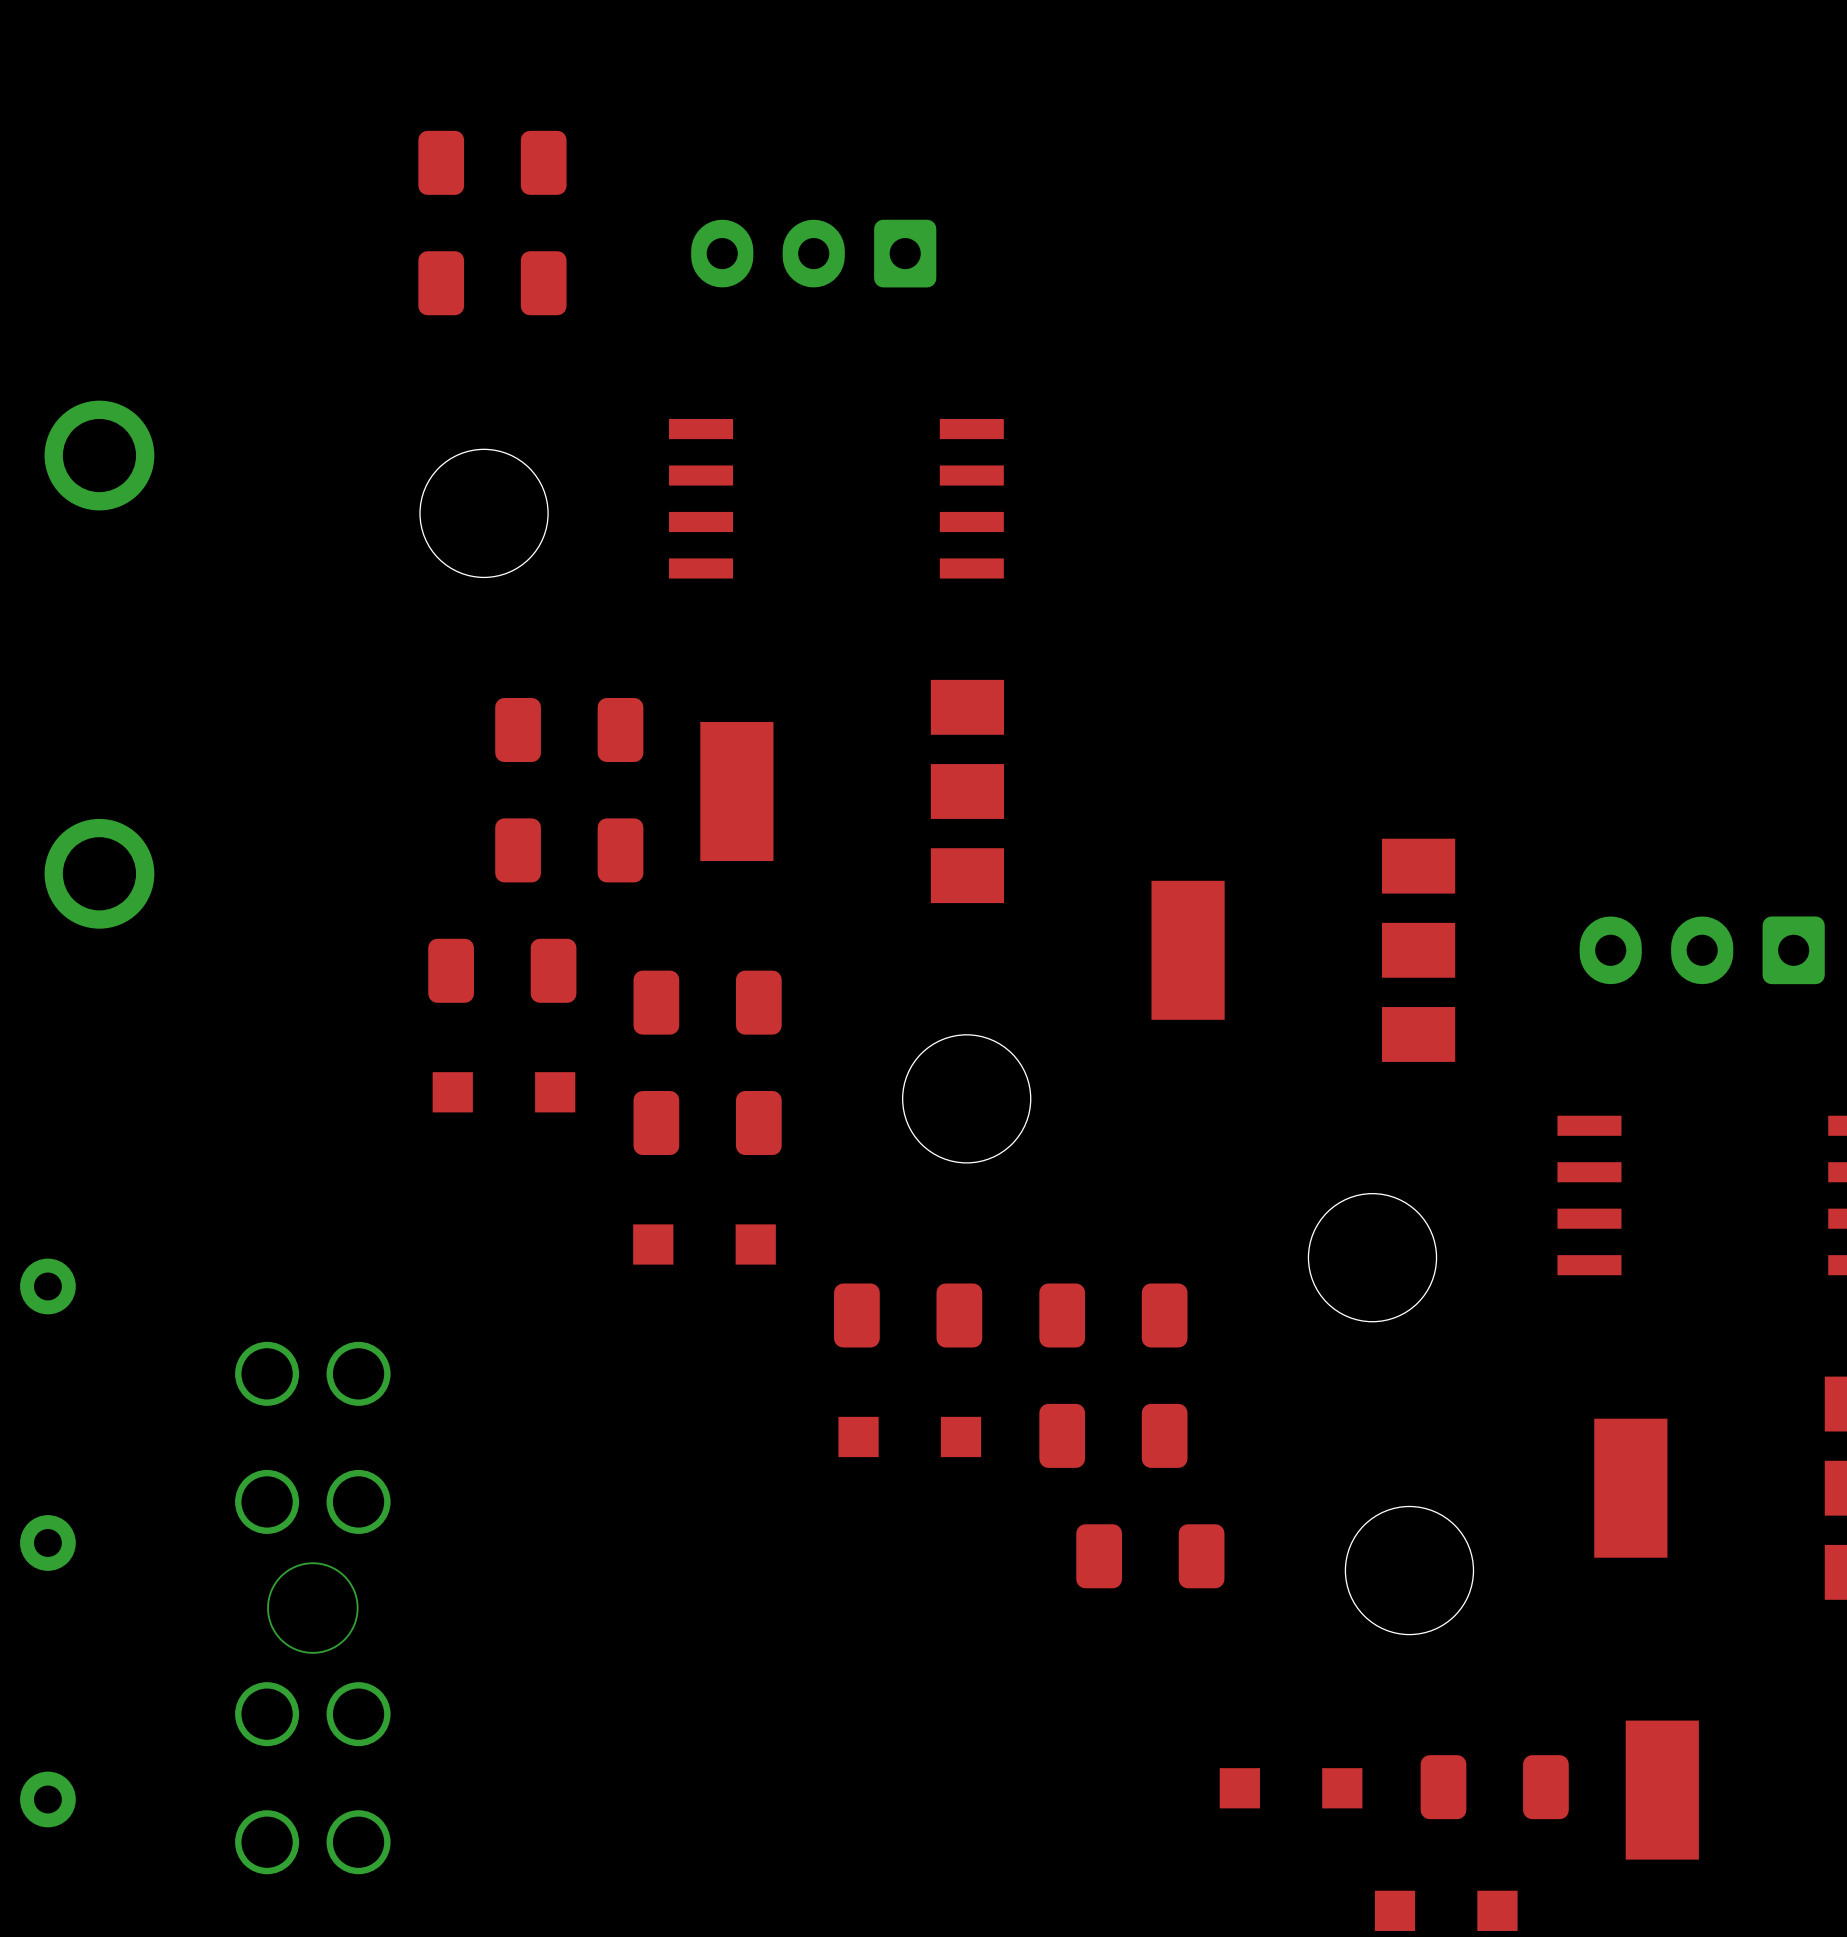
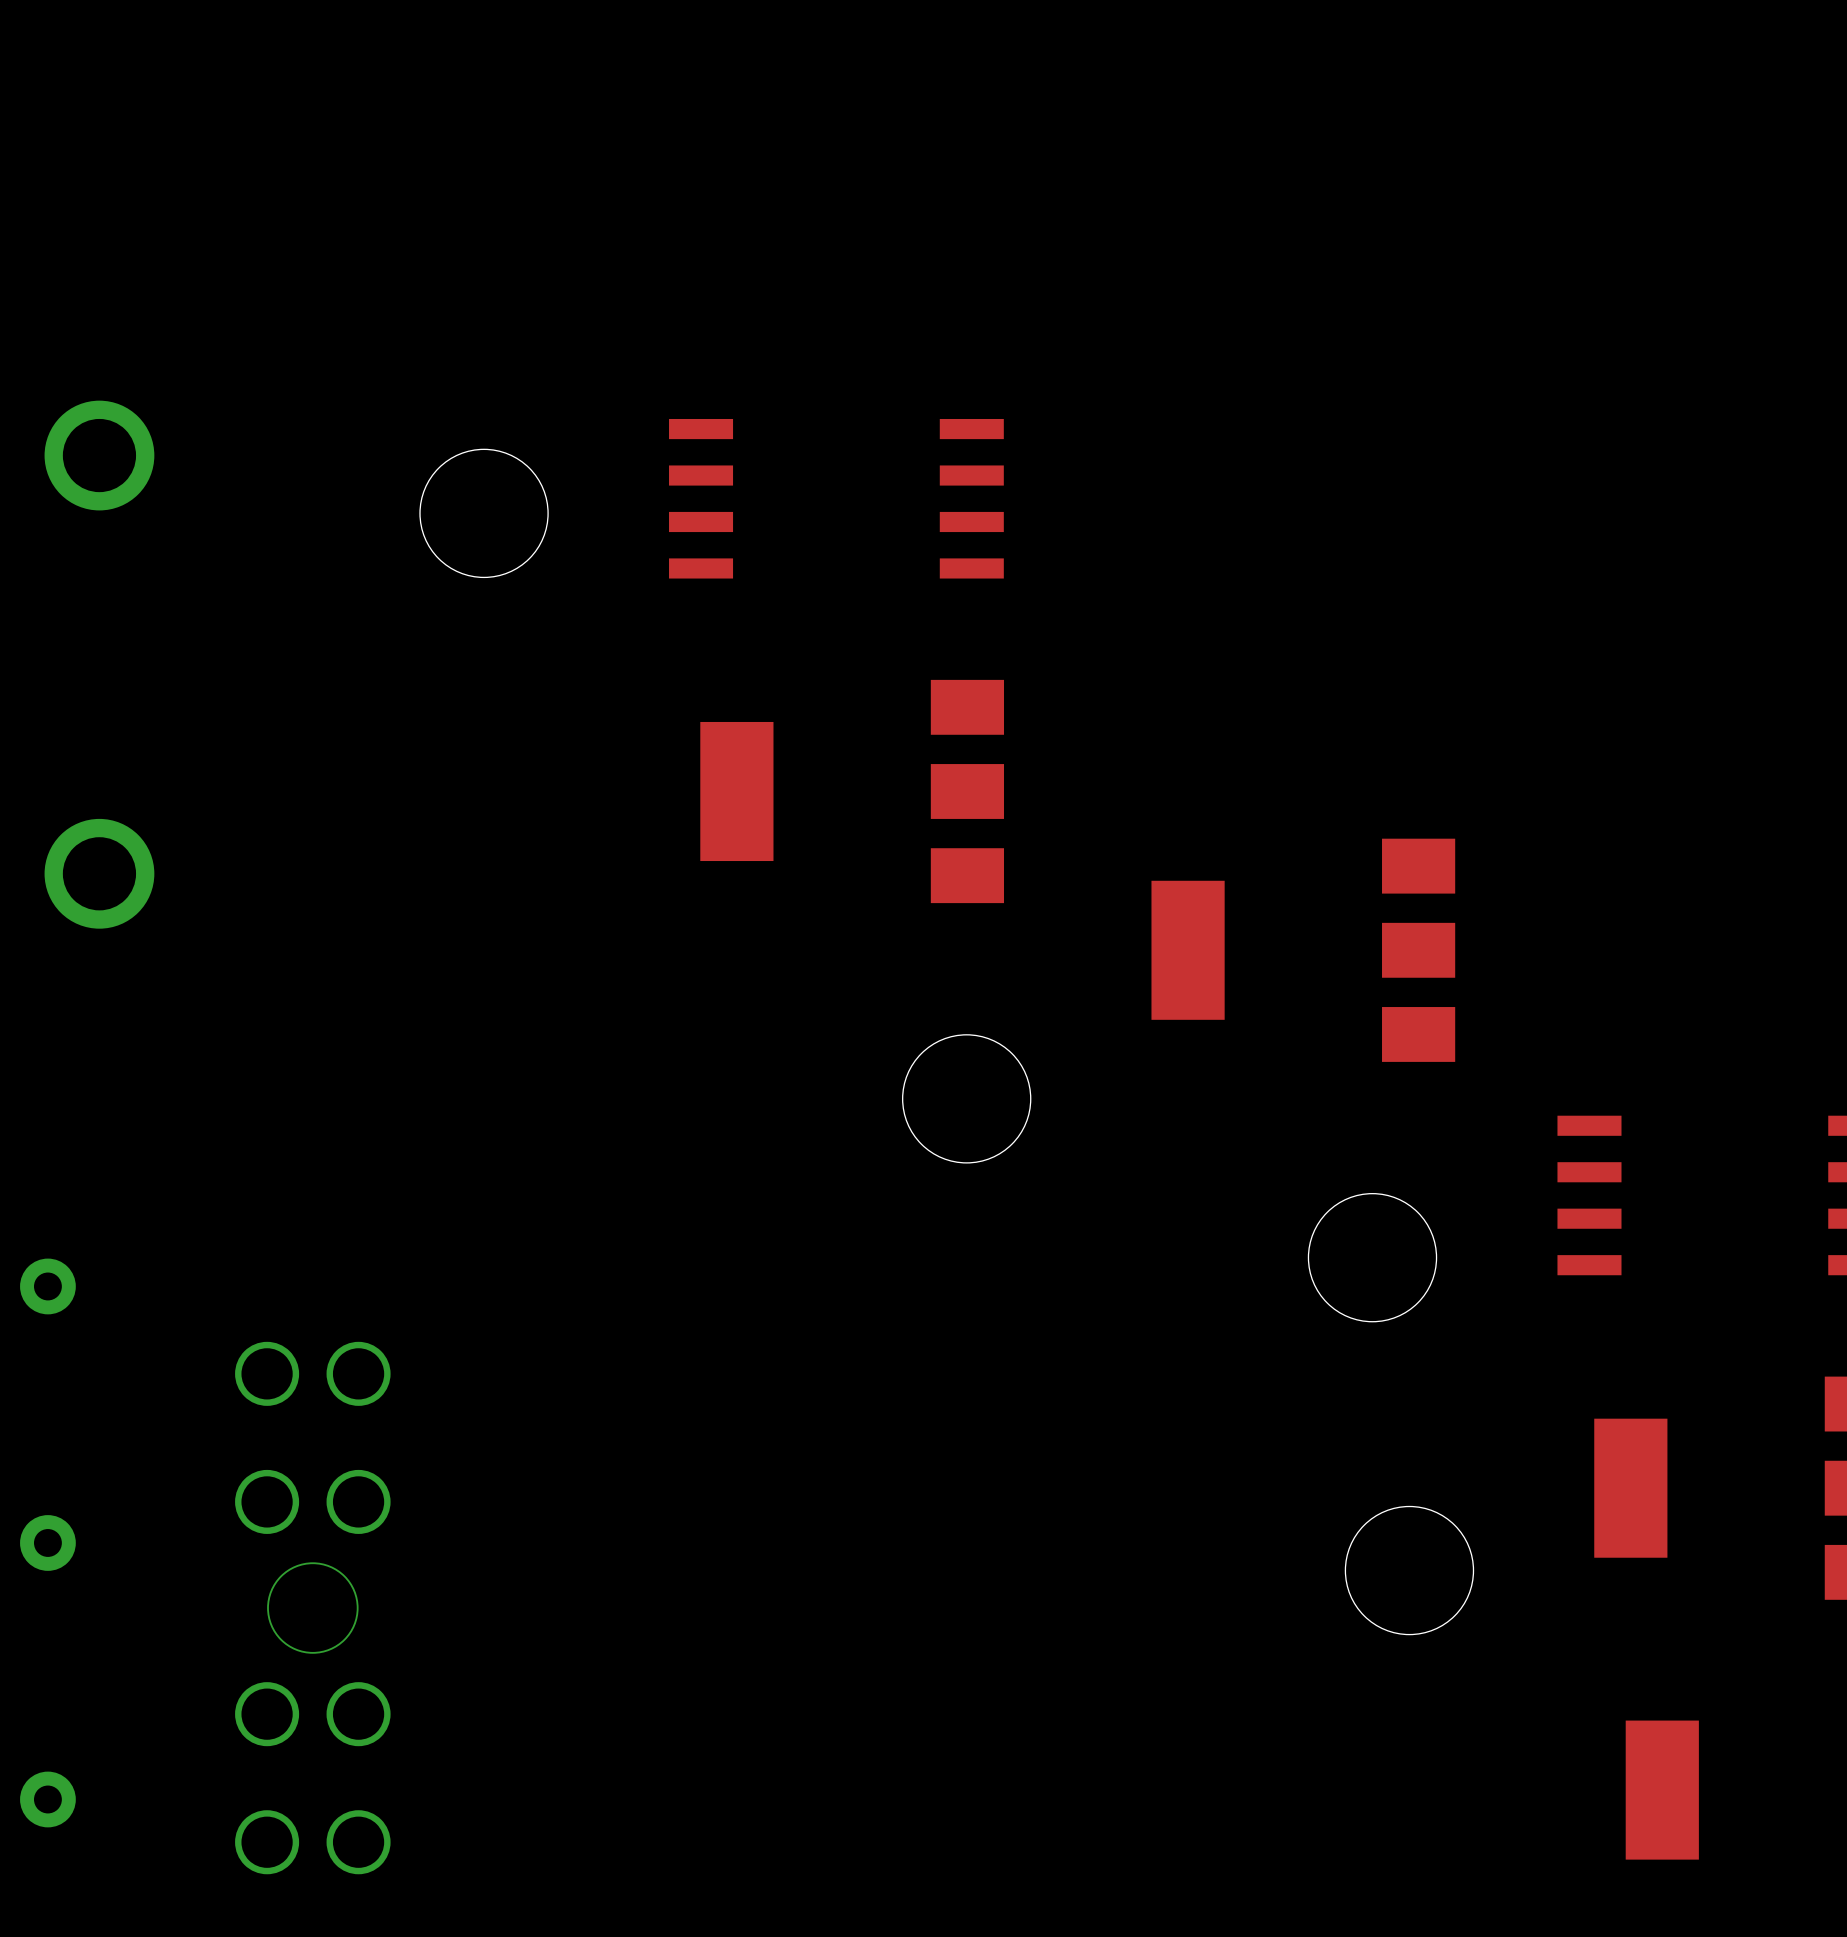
part: (492, 162) -> none
part: (813, 253) -> none
part: (492, 283) -> none
part: (569, 730) -> none
part: (569, 850) -> none
part: (1702, 950) -> none
part: (502, 970) -> none
part: (707, 1002) -> none
part: (503, 1092) -> none
part: (707, 1123) -> none
part: (704, 1244) -> none
part: (908, 1315) -> none
part: (1113, 1315) -> none
part: (1113, 1435) -> none
part: (909, 1436) -> none
part: (1150, 1556) -> none
part: (1494, 1787) -> none
part: (1291, 1788) -> none
part: (1446, 1910) -> none

